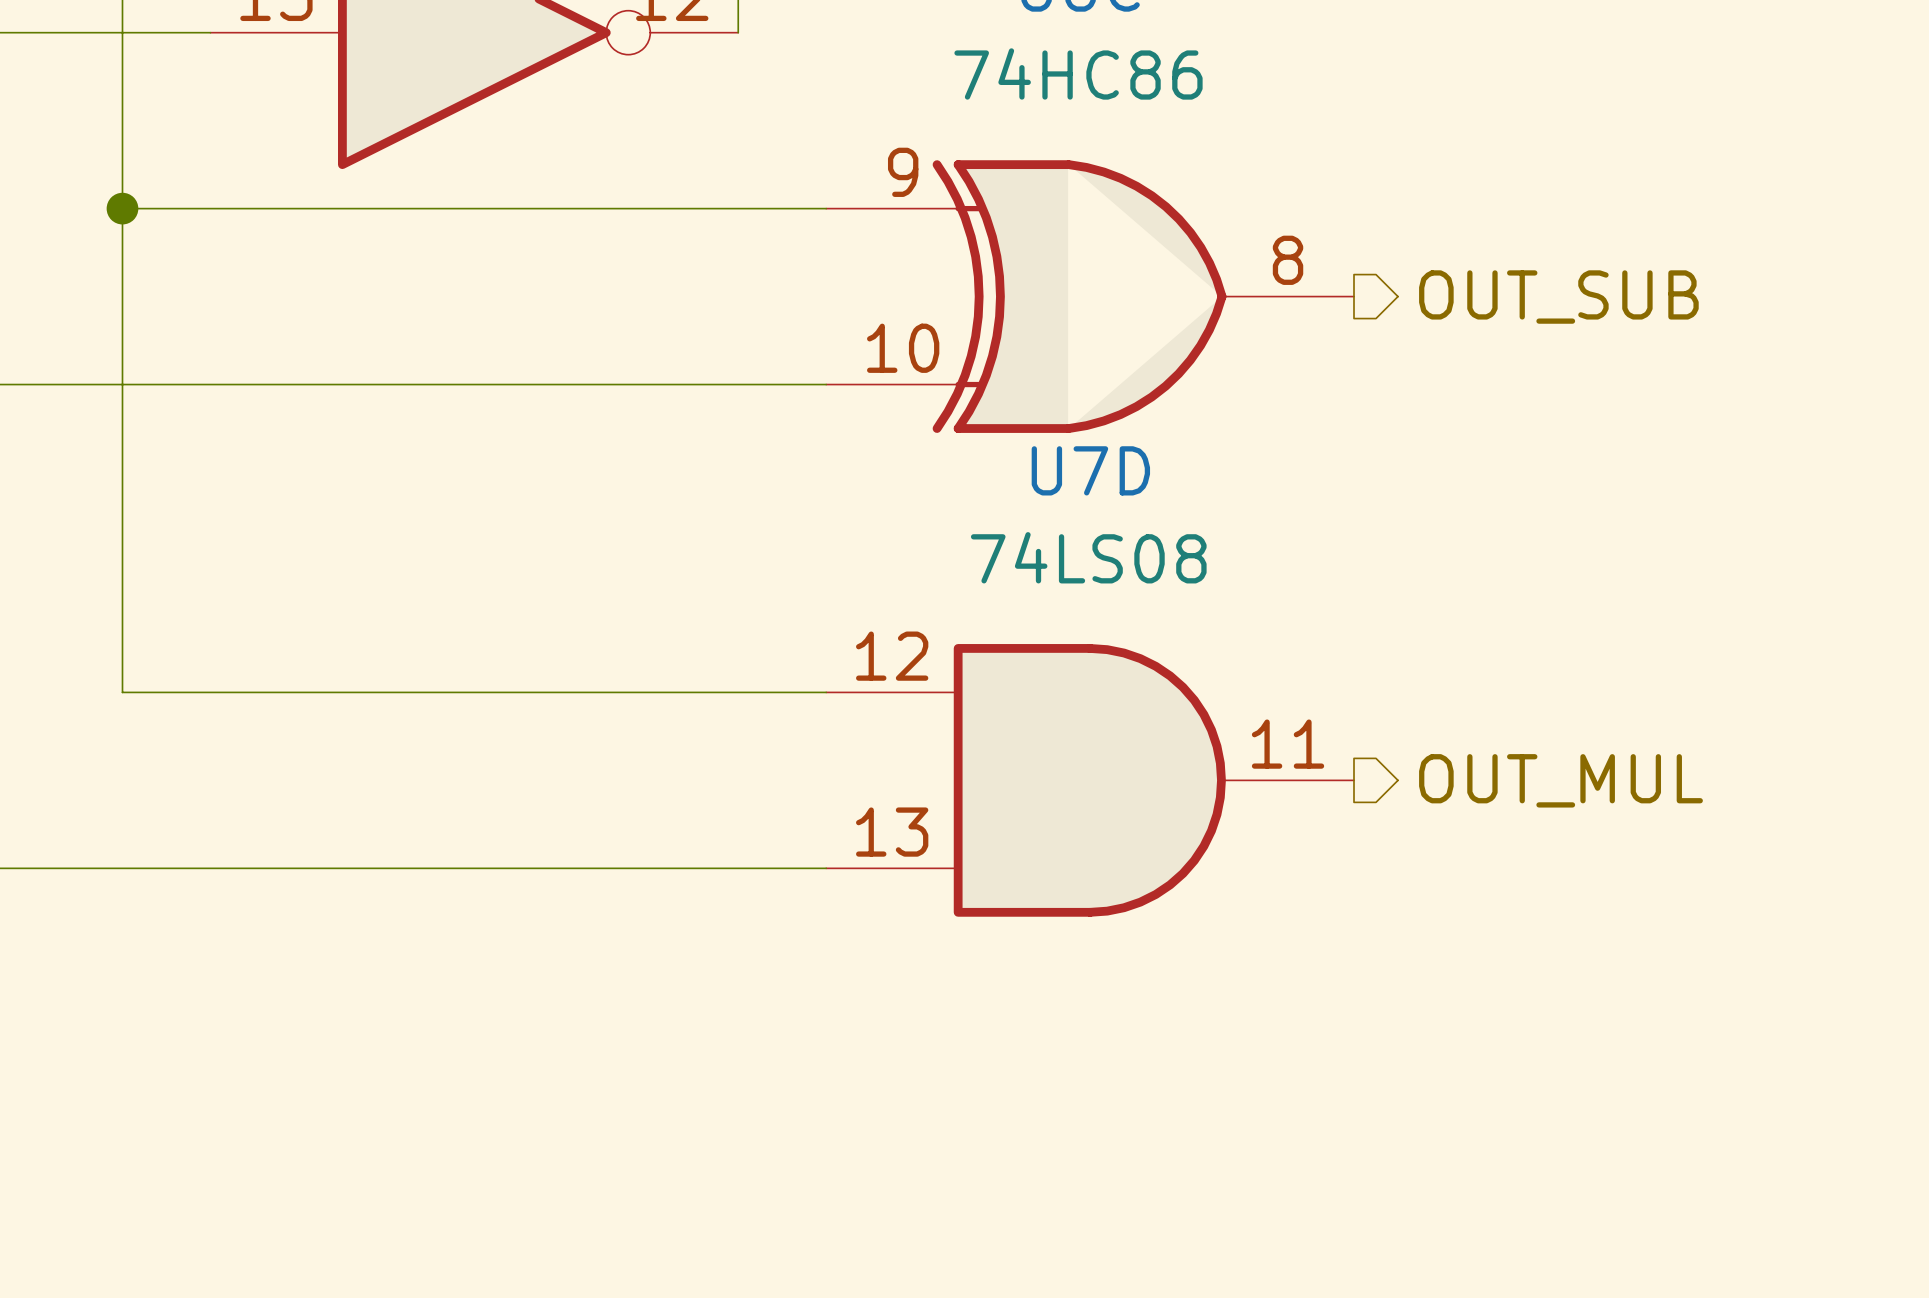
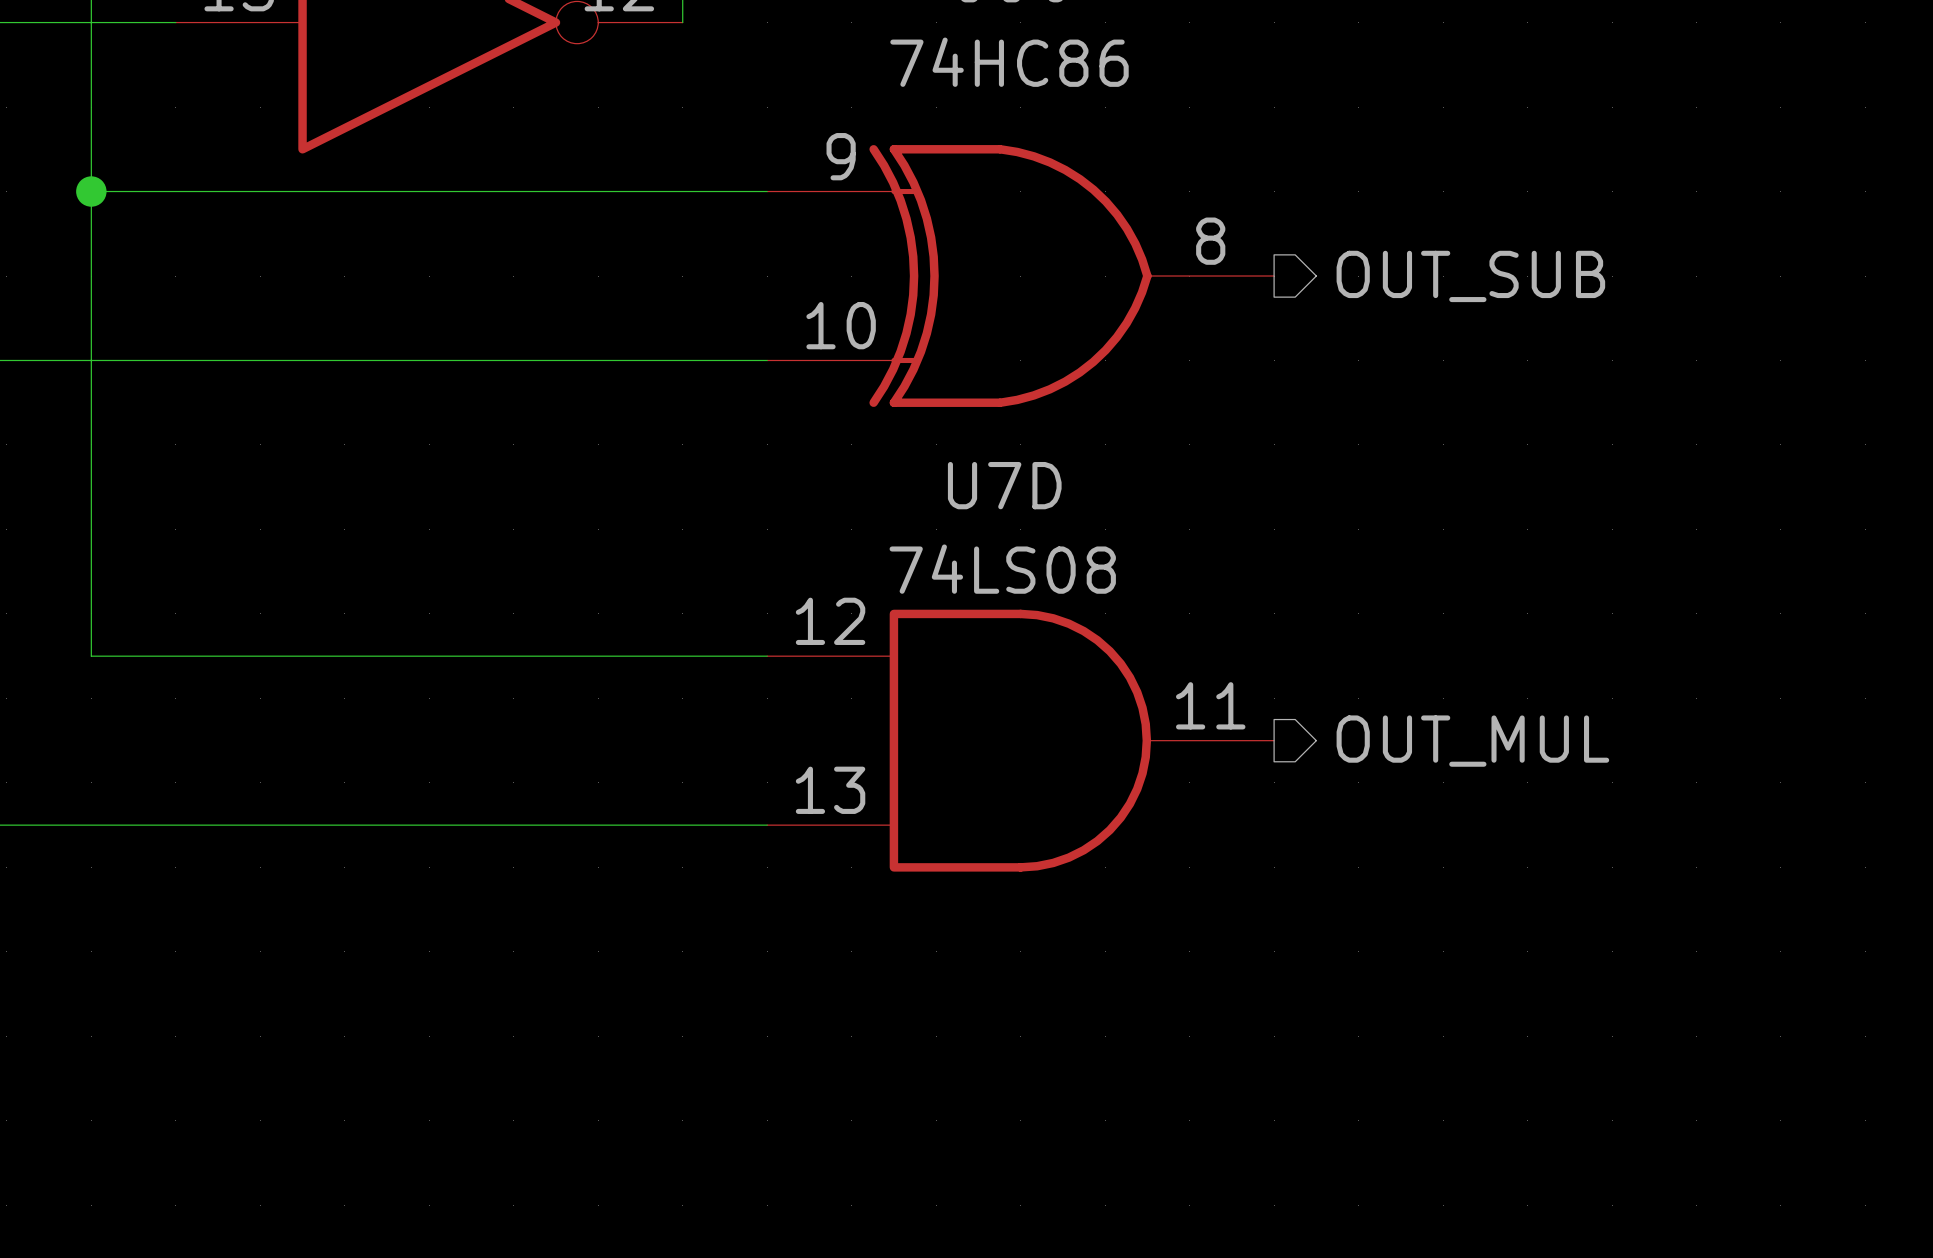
U7D name position: U7D (1090, 470) -> U7D (1004, 485)
U7D value position: 74LS08 (1088, 557) -> 74LS08 (1002, 569)

